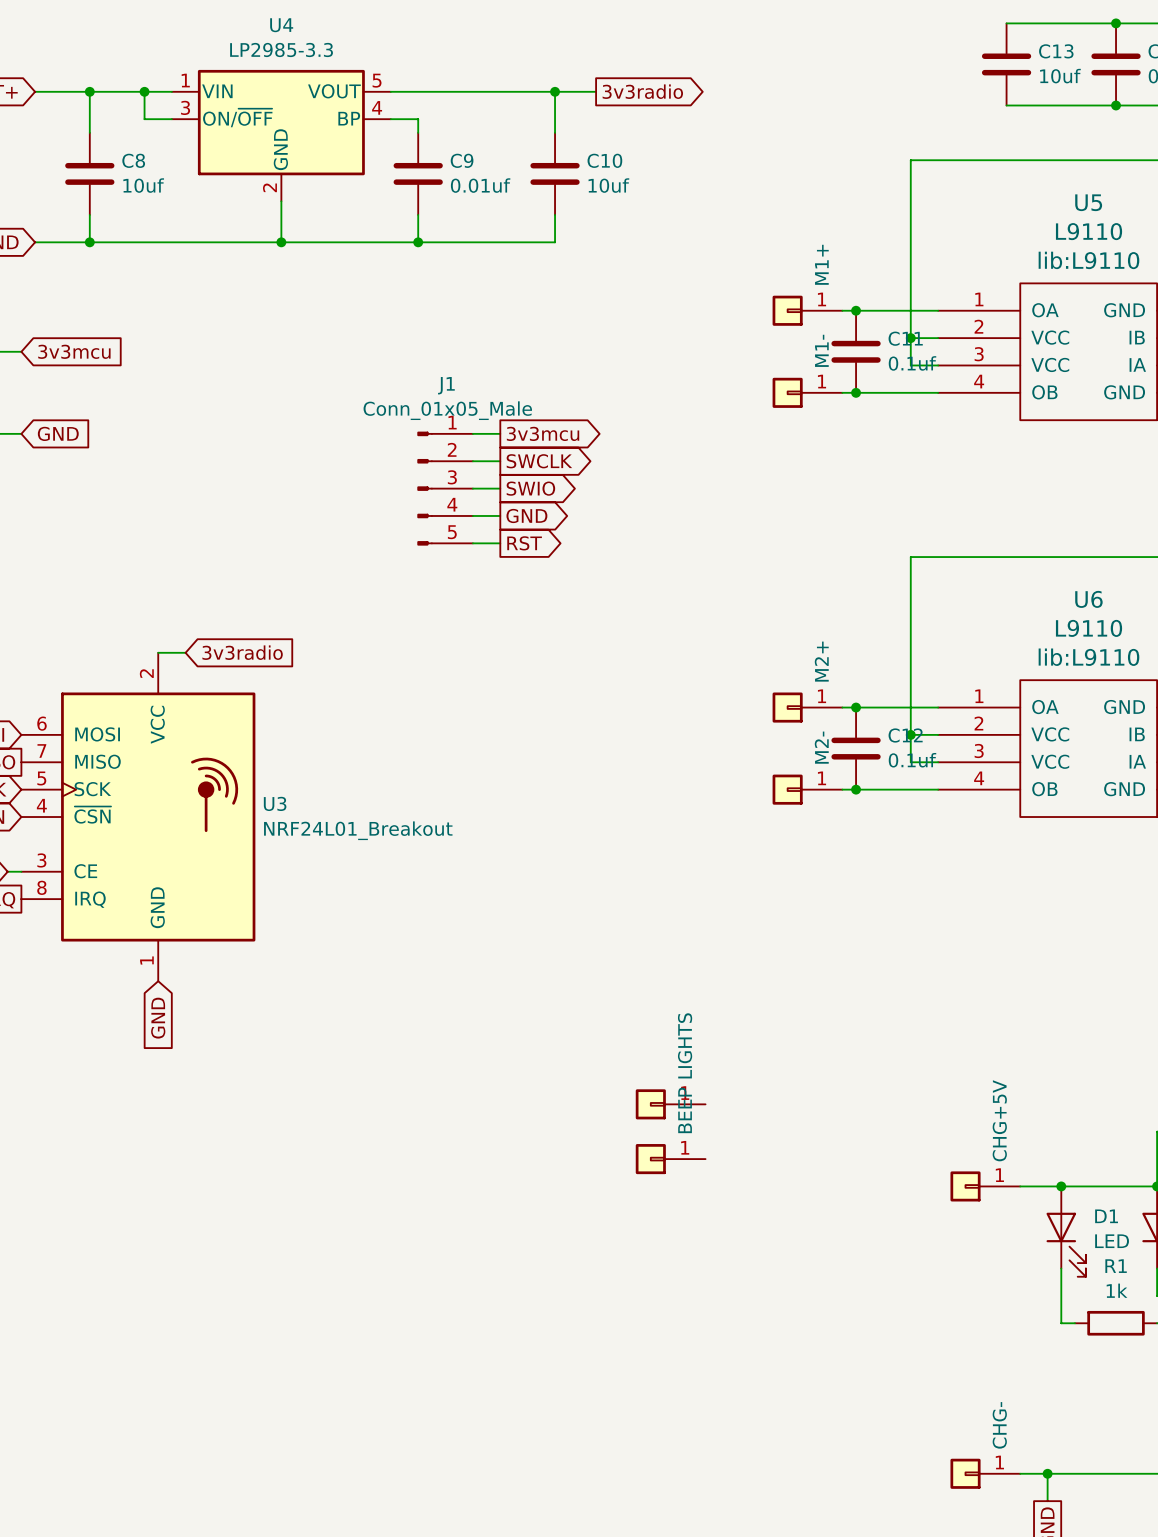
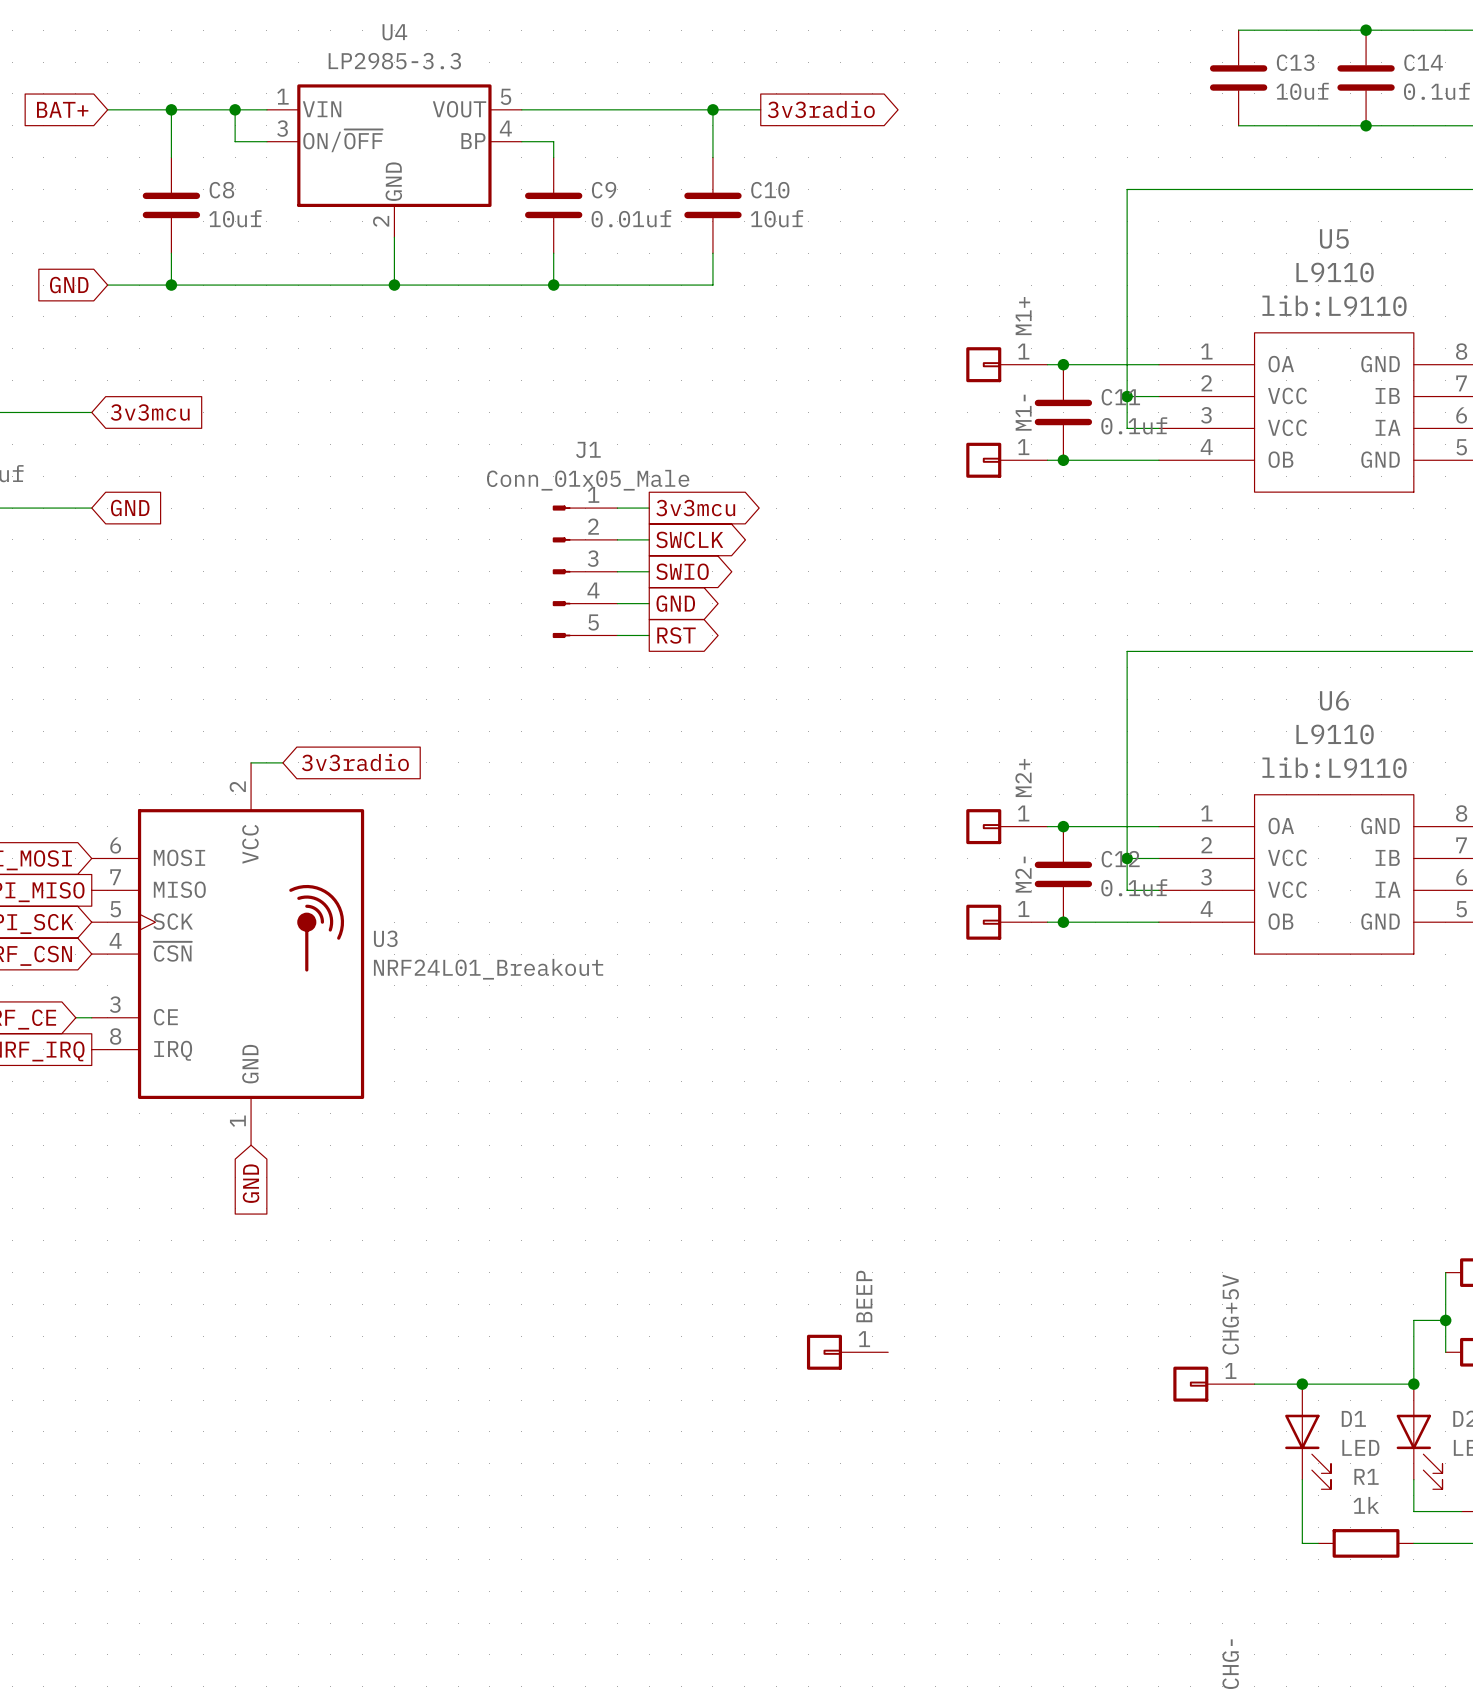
part: LIGHTS (670, 1104) -> none

